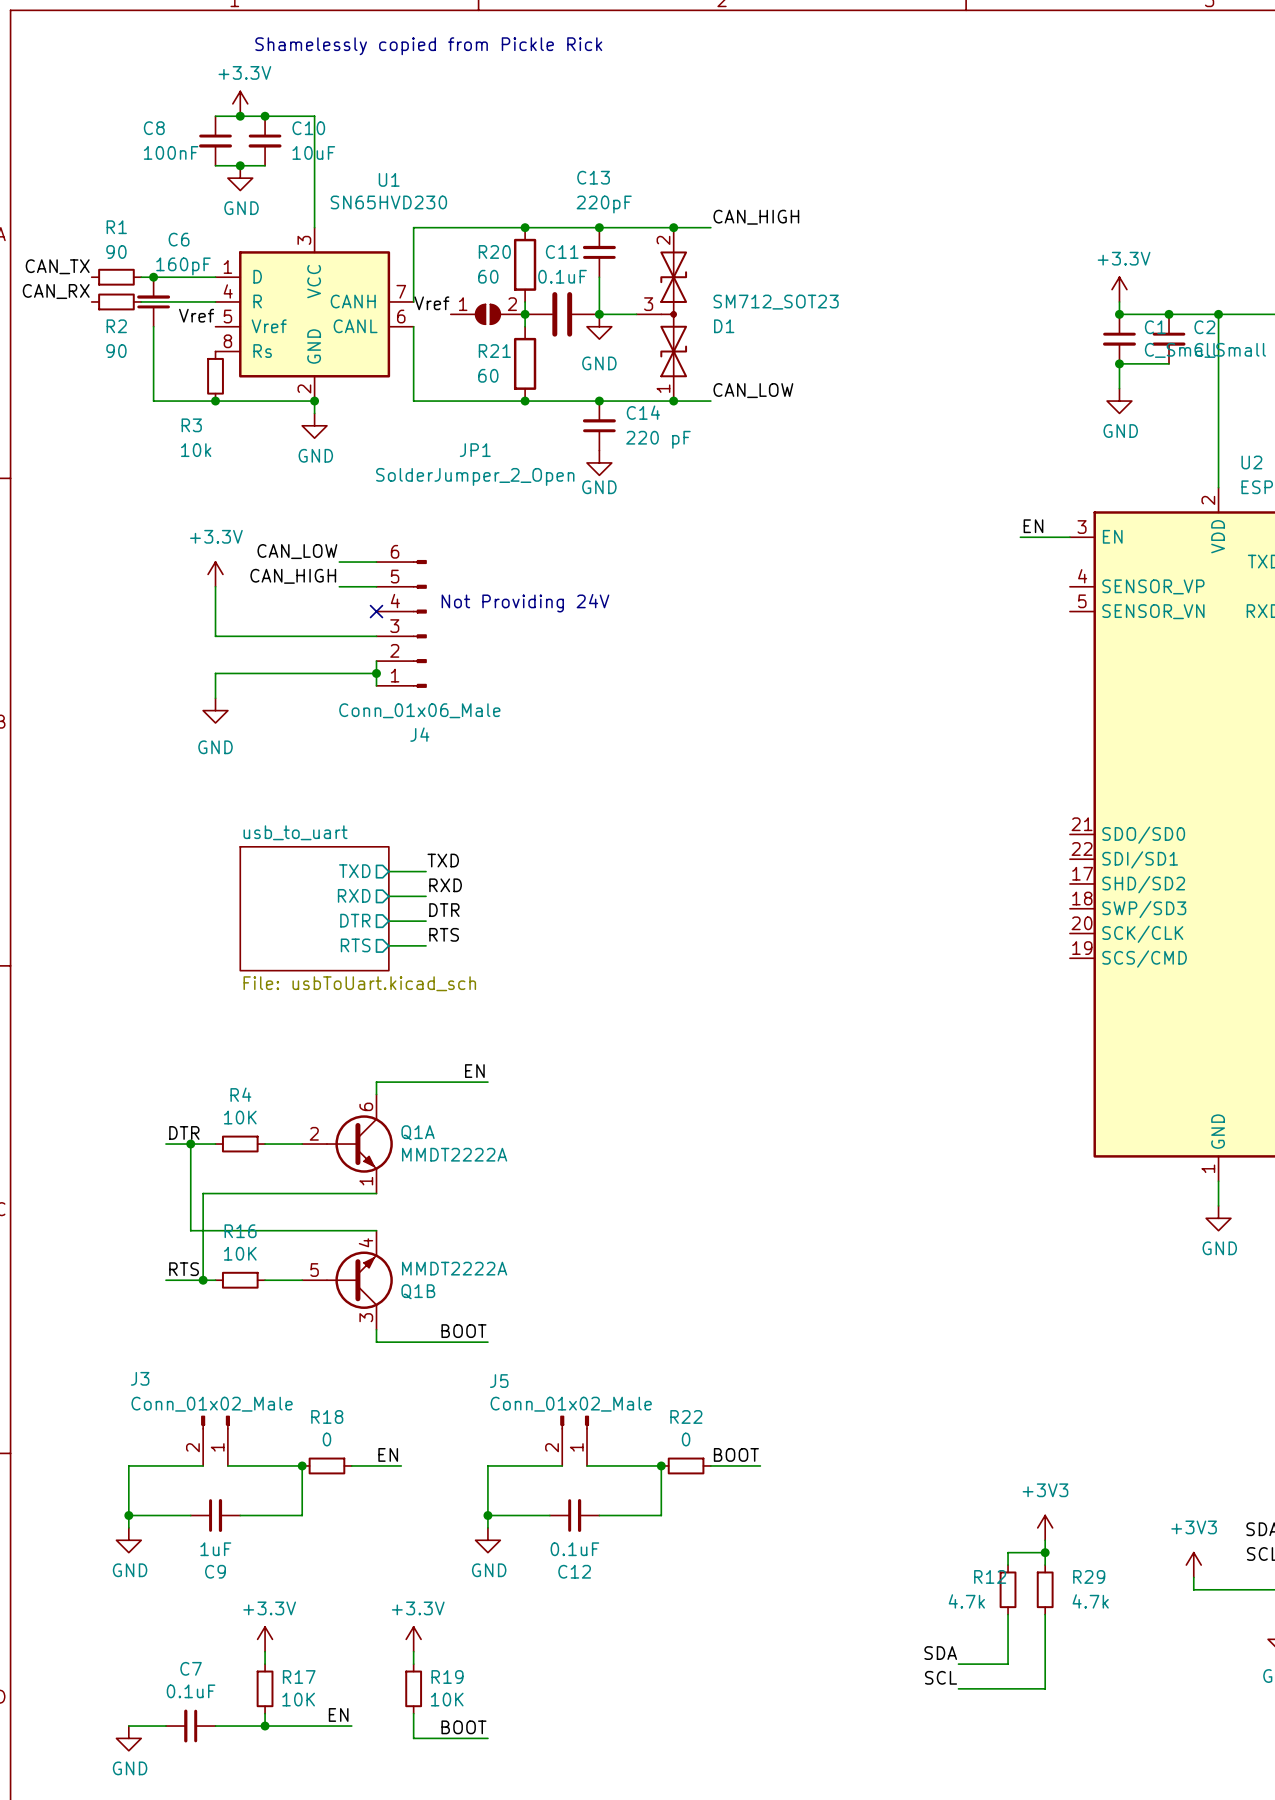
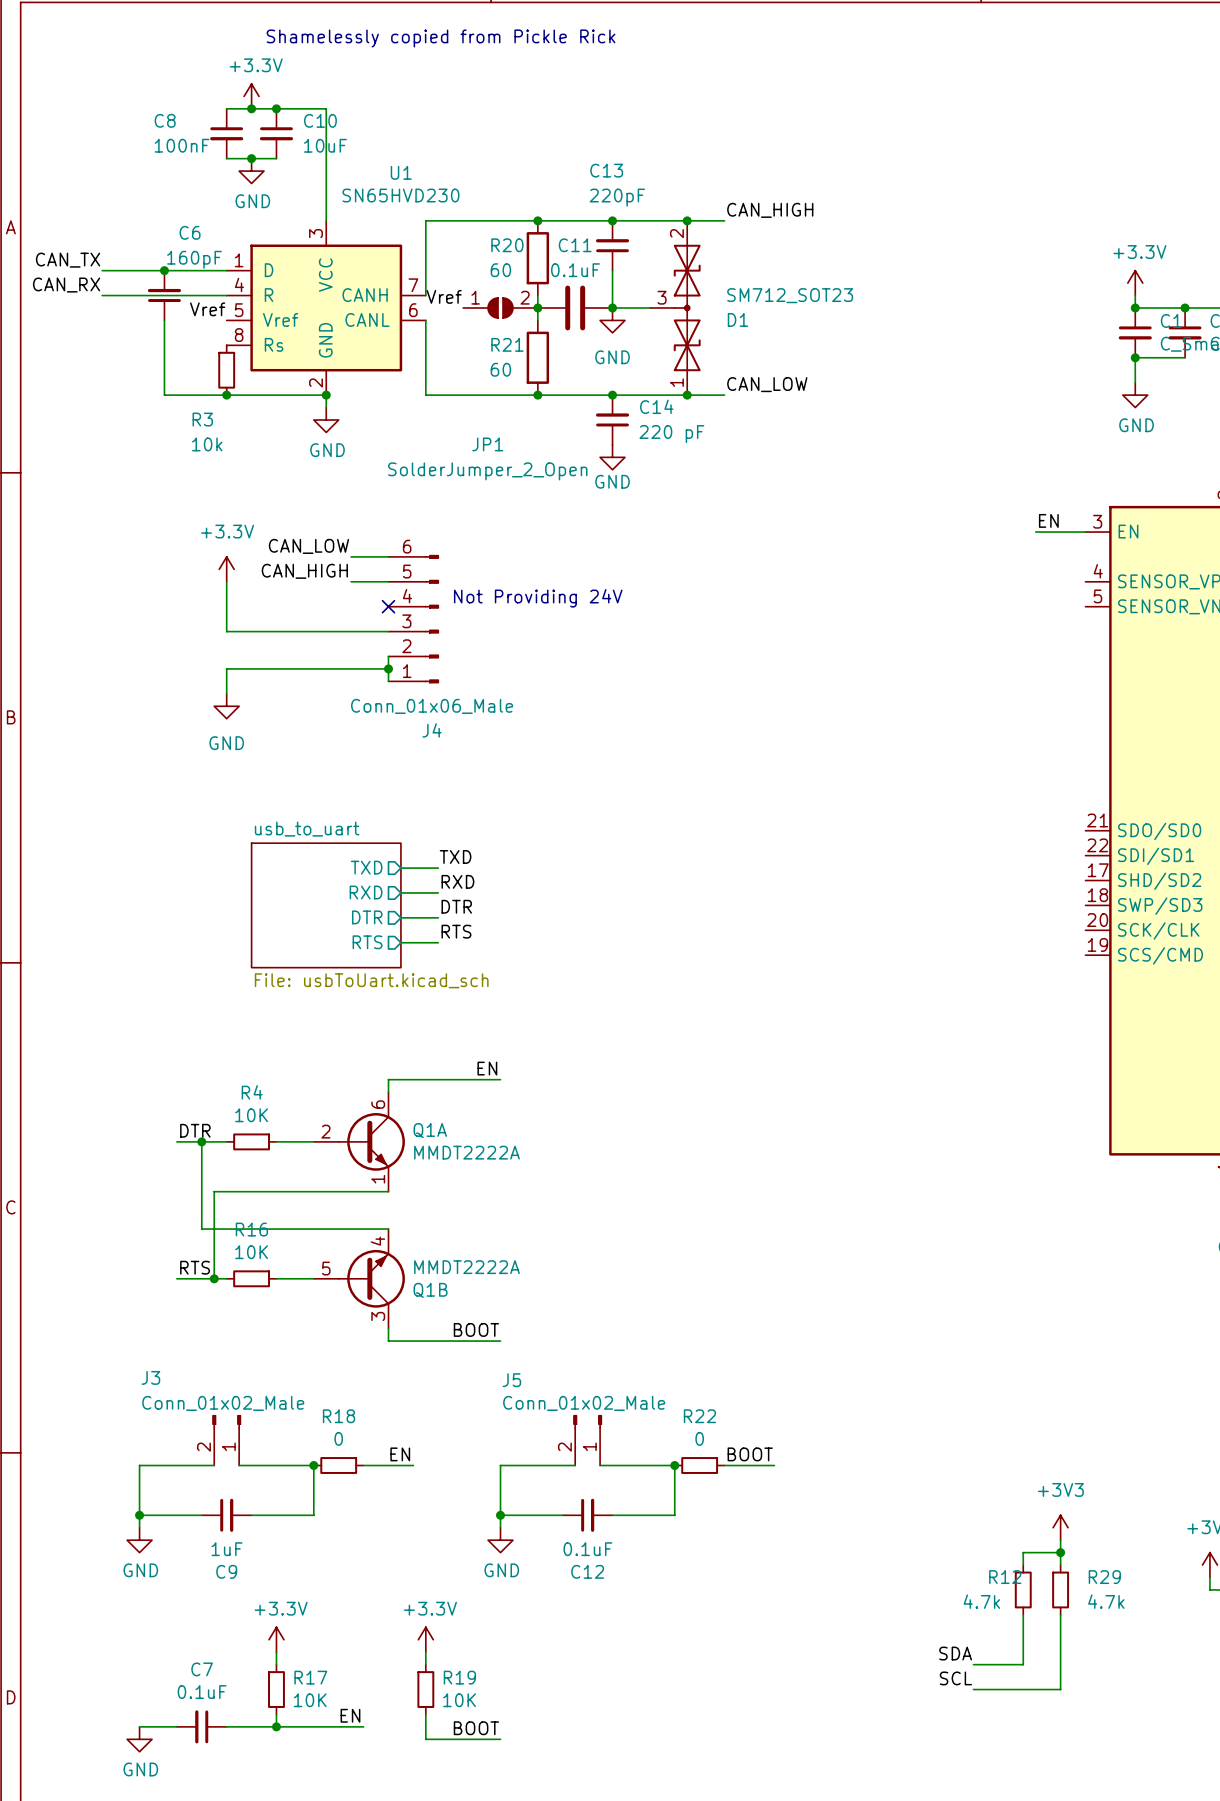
wire: none -> (102, 270) (152, 270)
R1: 90 (116, 277) -> none
wire: none -> (102, 295) (152, 295)
R2: 90 (116, 301) -> none

